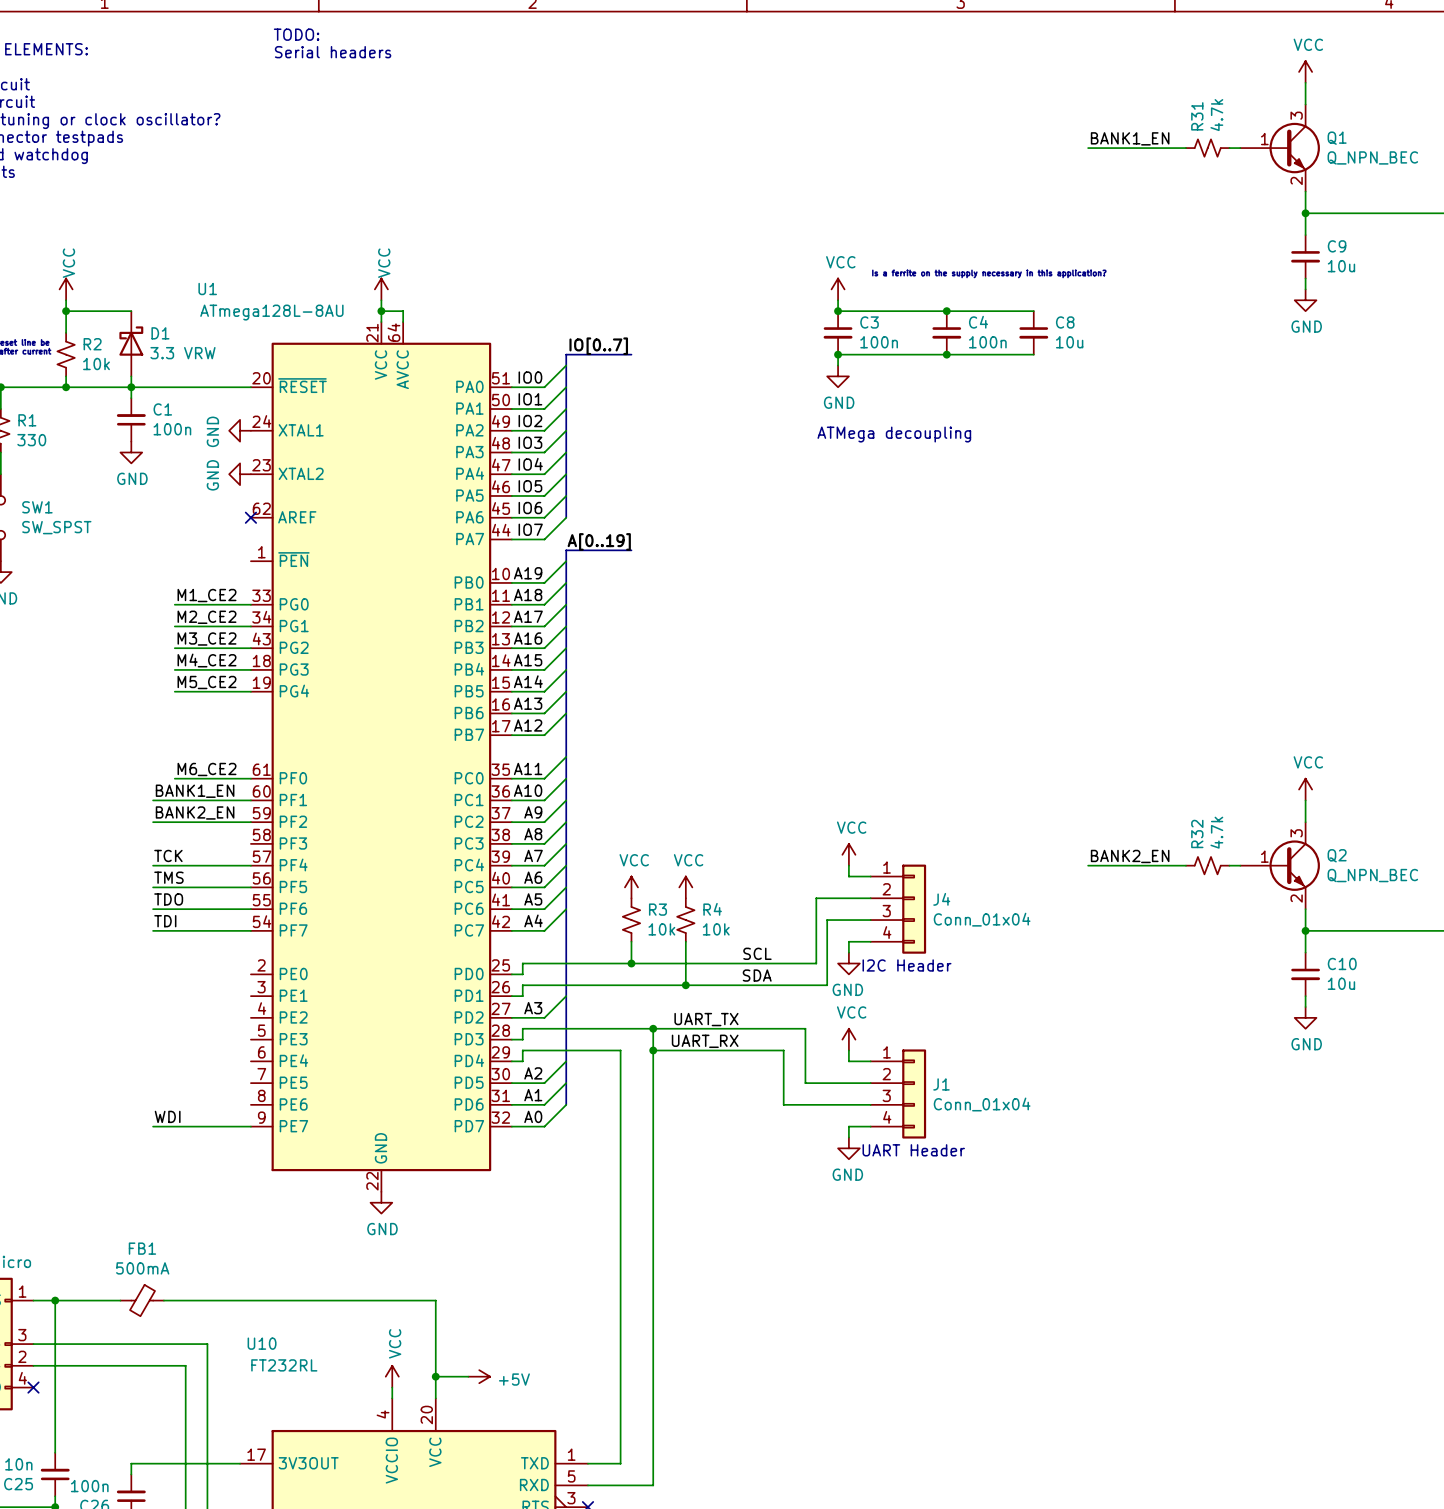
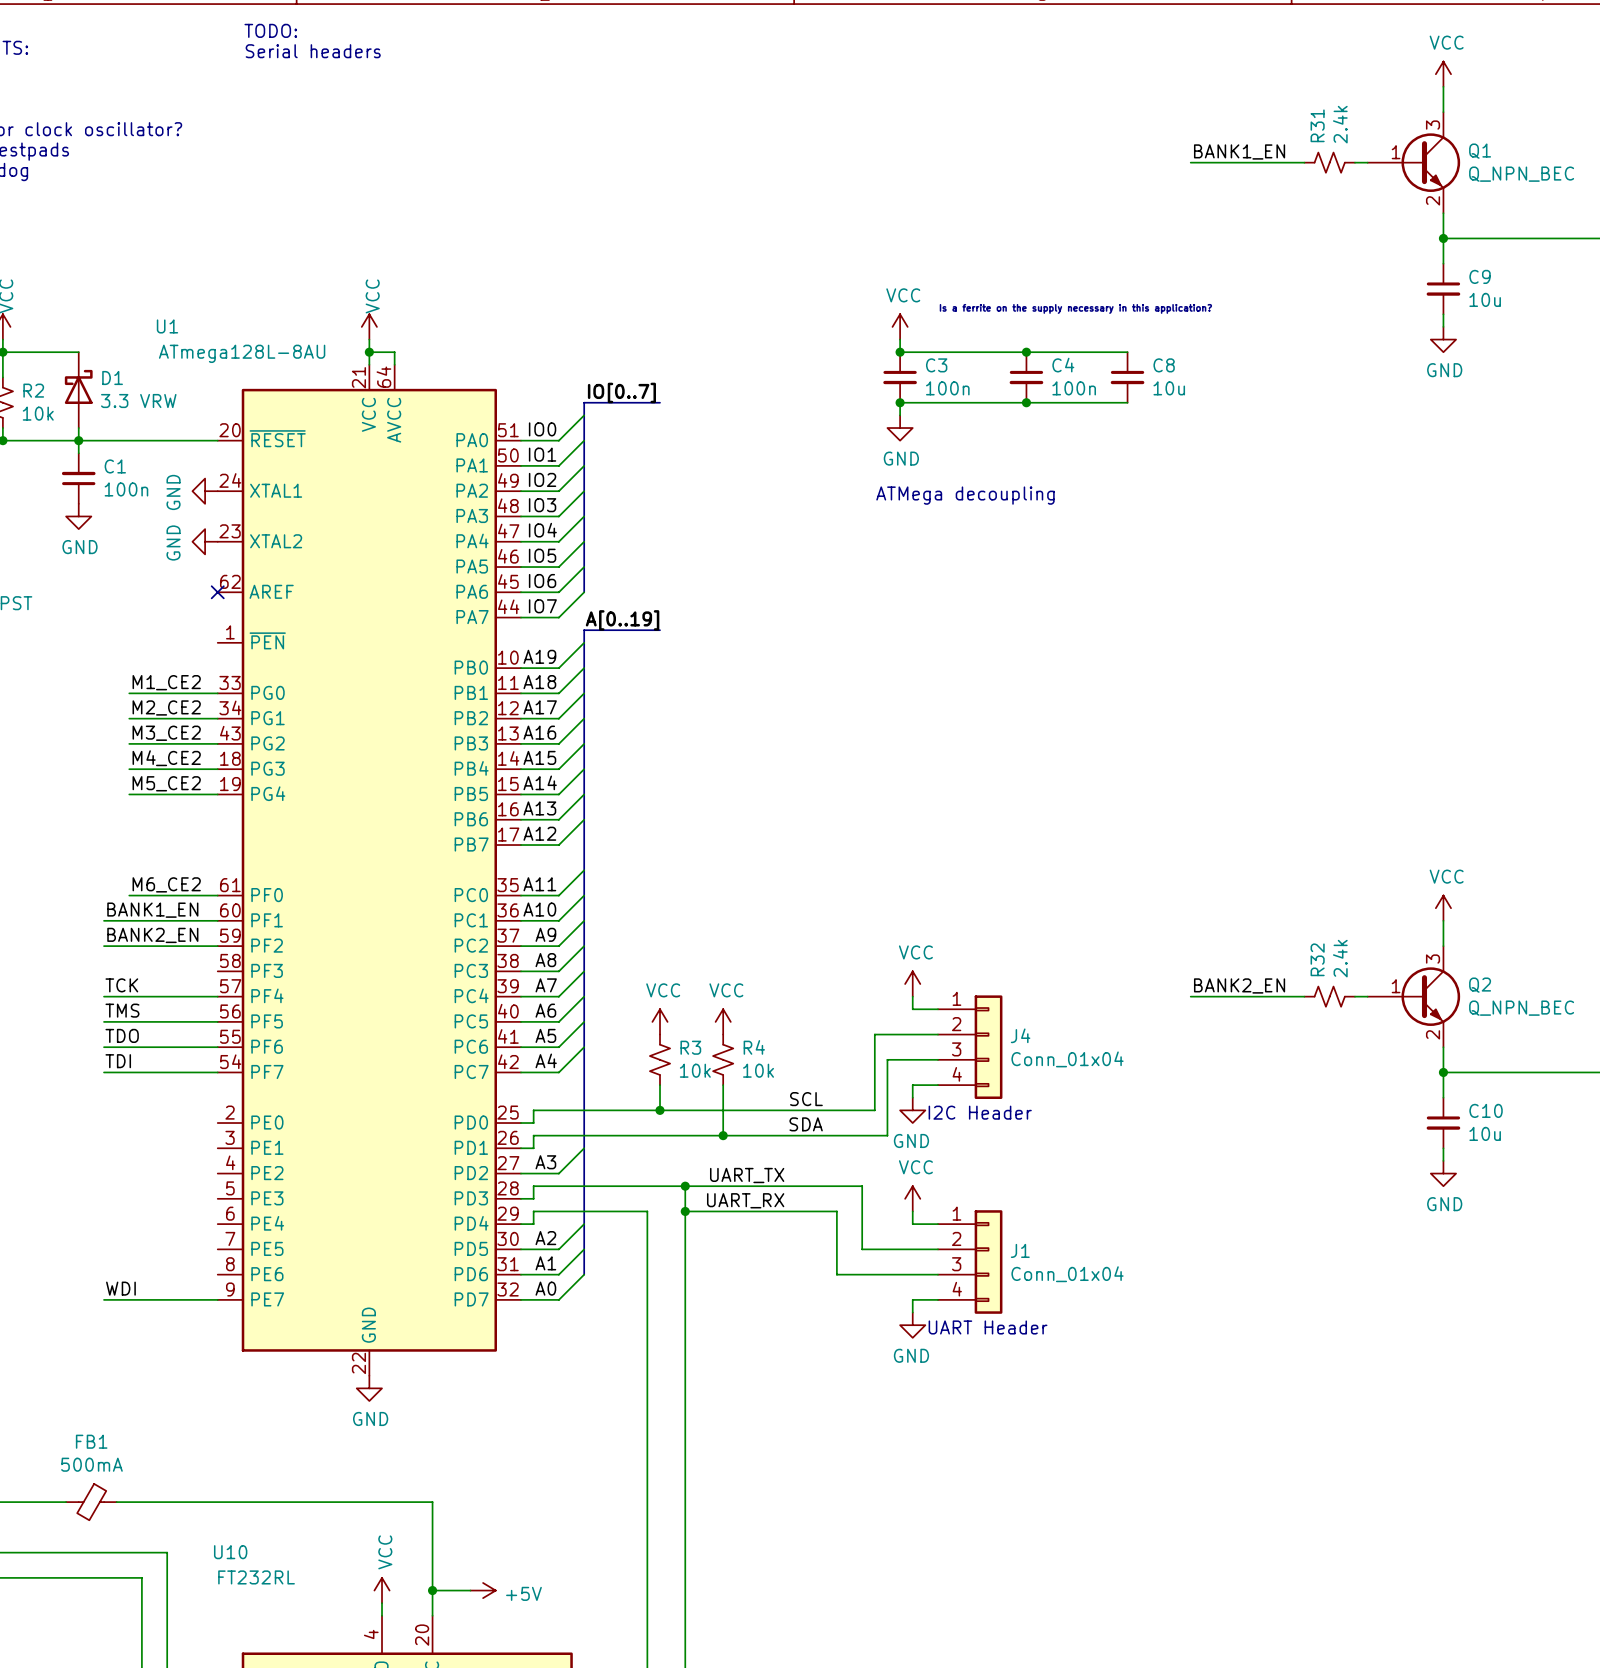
R31 value: 4.7k (1216, 115) -> 2.4k (1340, 124)
R32 value: 4.7k (1216, 832) -> 2.4k (1340, 958)

